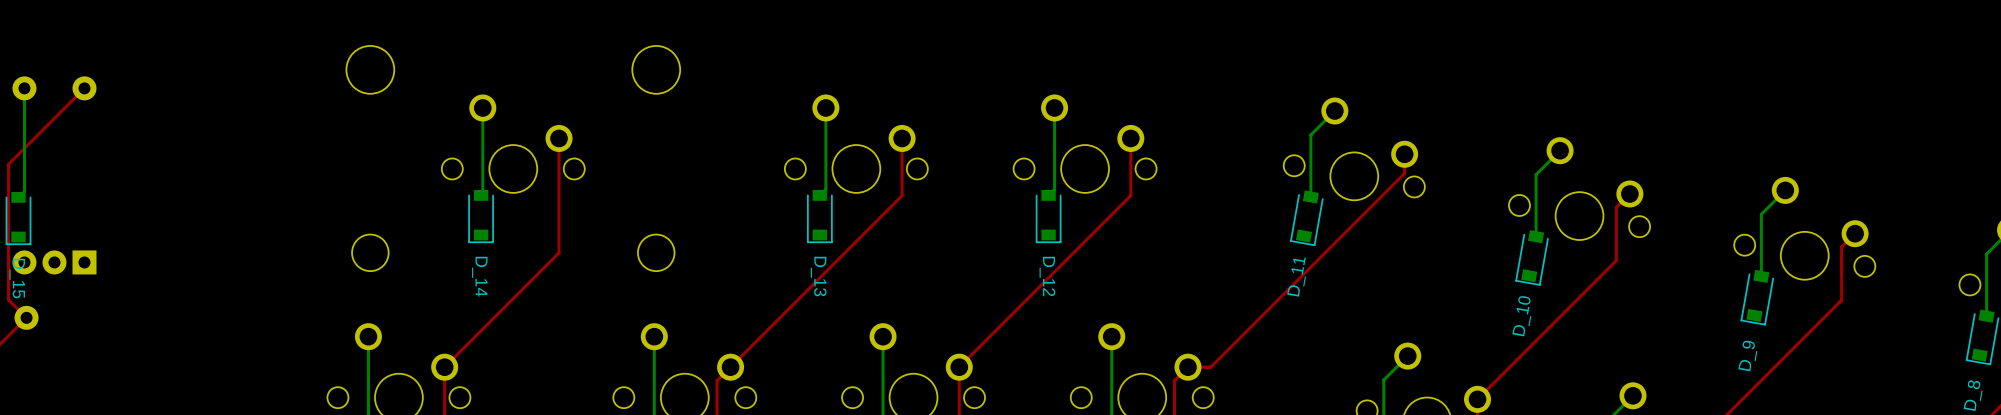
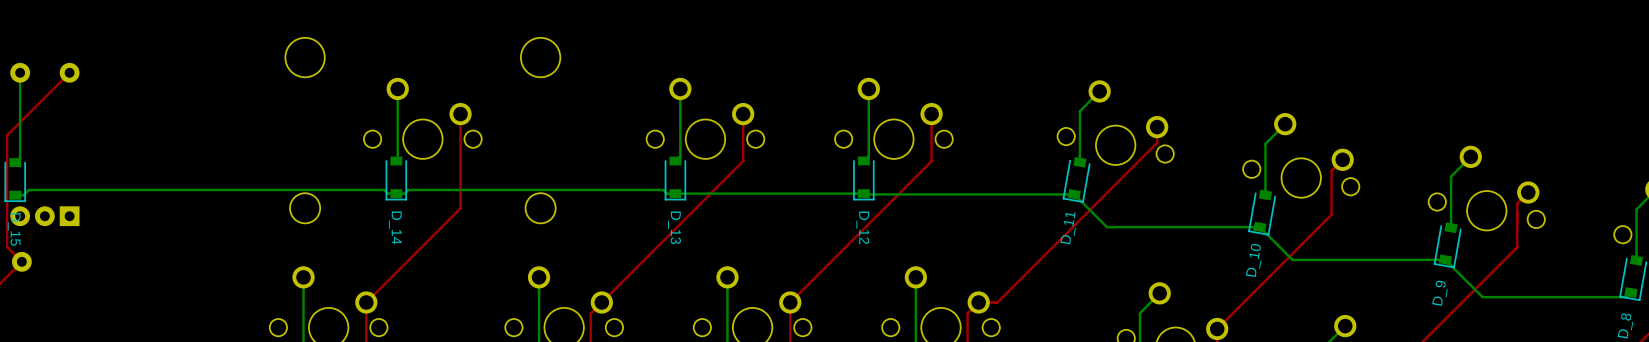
bottom track: none -> (15, 195) (23, 195) (28, 189) (384, 189) (387, 193) (404, 193) (408, 189) (663, 189) (667, 193) (1074, 194) (1106, 227) (1259, 227) (1292, 259) (1445, 259) (1482, 297) (1626, 297) (1630, 292)

